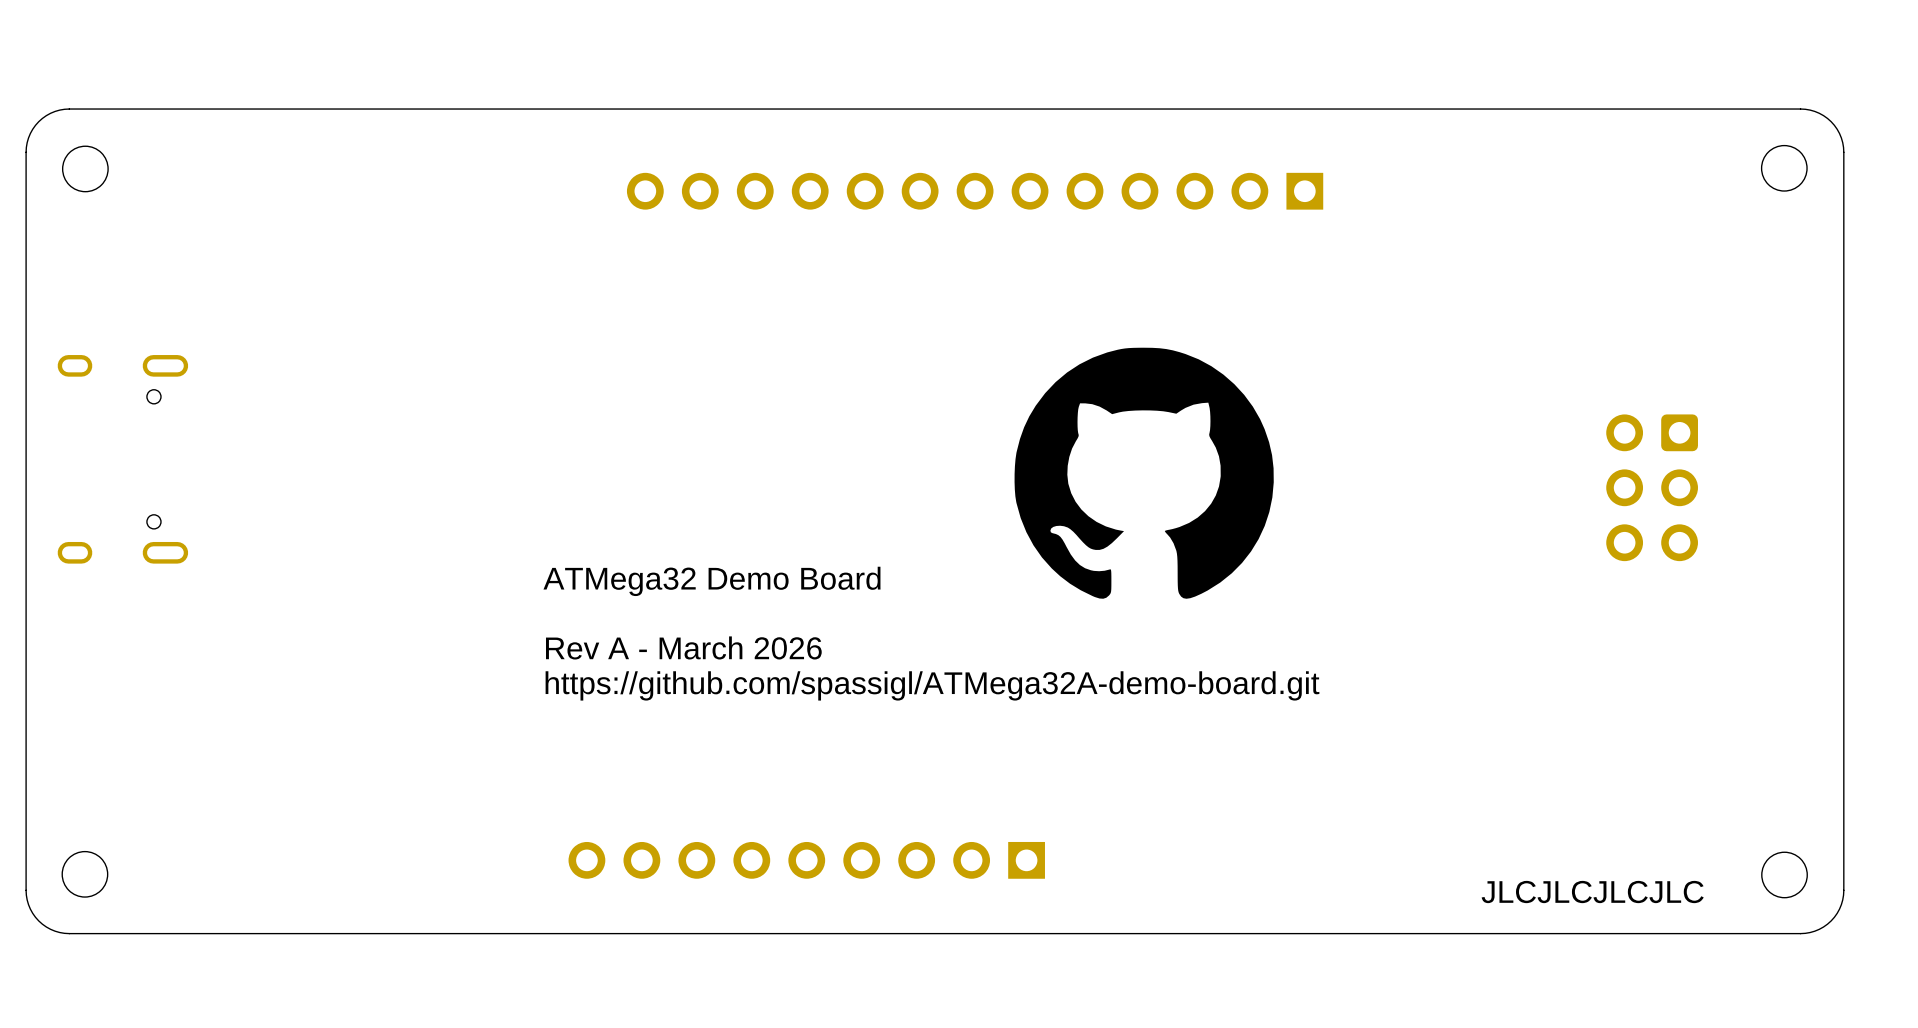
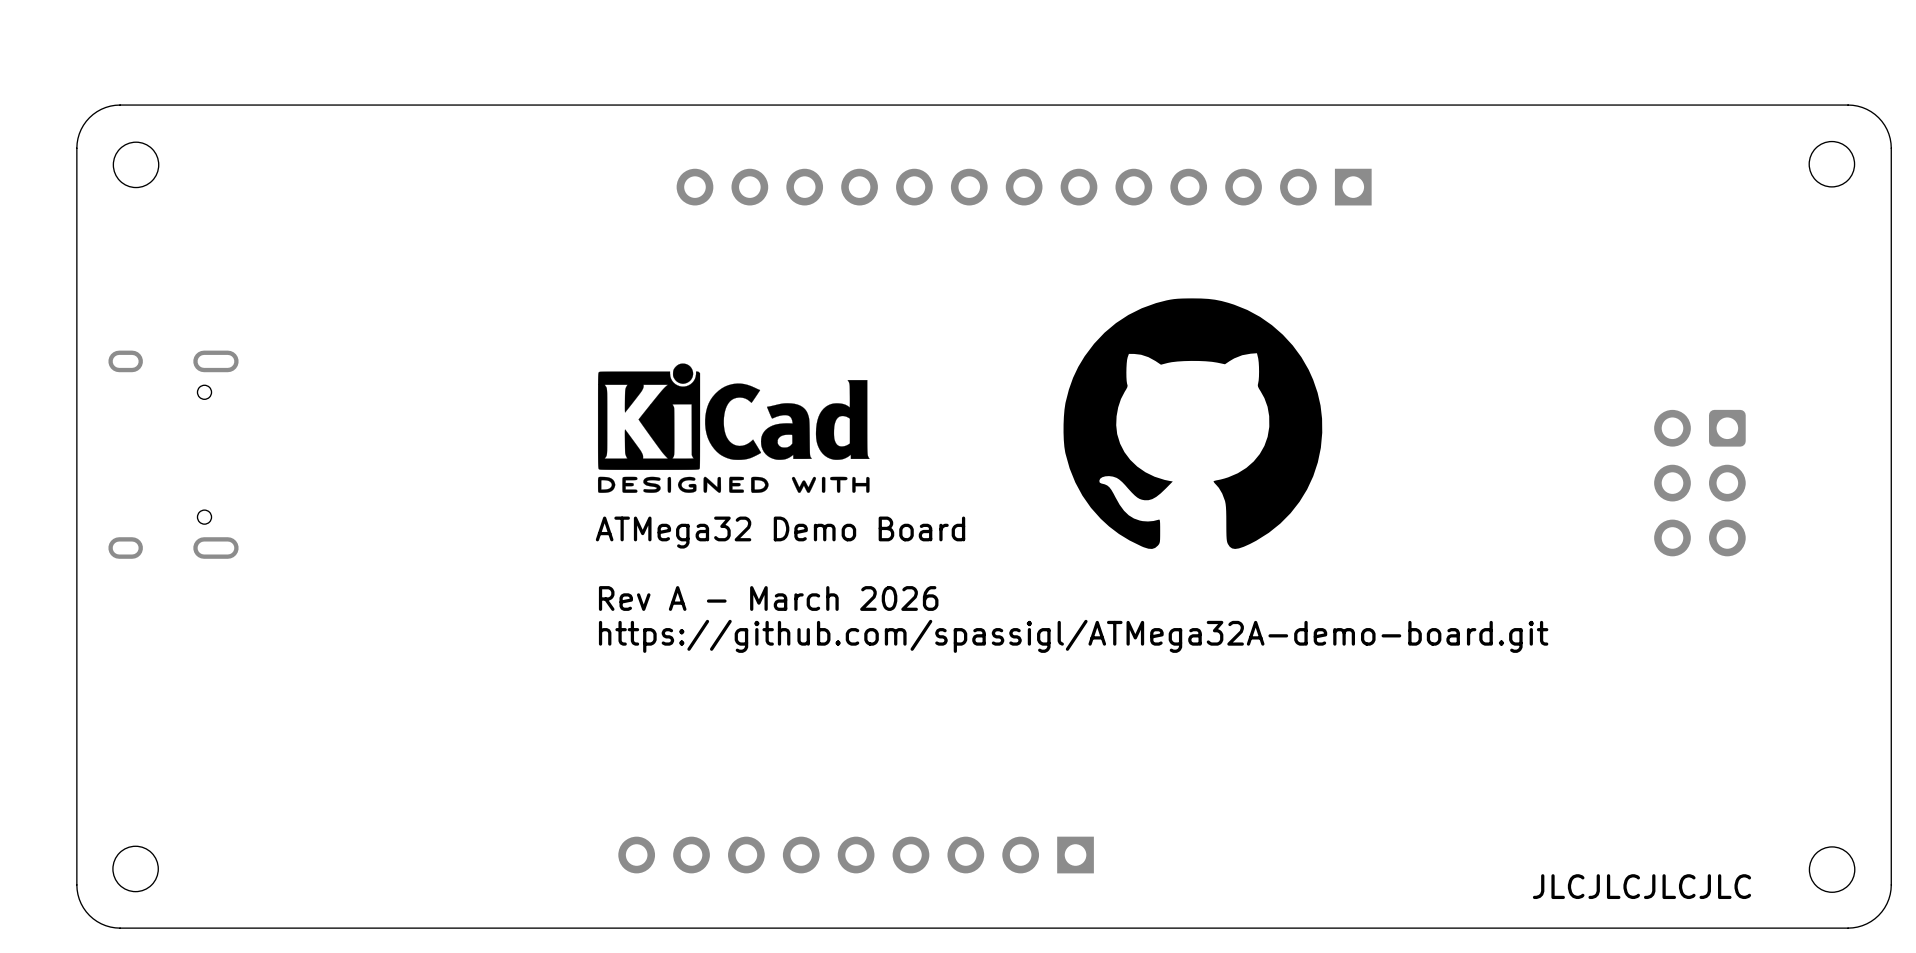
drawing: none -> [597, 363, 870, 493]
drawing position: (1144, 473) -> (1192, 423)
text position: ATMega32 Demo Board (712, 581) -> ATMega32 Demo Board (780, 532)
text: none -> Rev A - March 2026 (768, 598)
text: Rev A - March 2026 (683, 647) -> https://github.com/spassigl/ATMega32A-demo-board.git (1073, 636)
text: https://github.com/spassigl/ATMega32A-demo-board.git (932, 685) -> none

